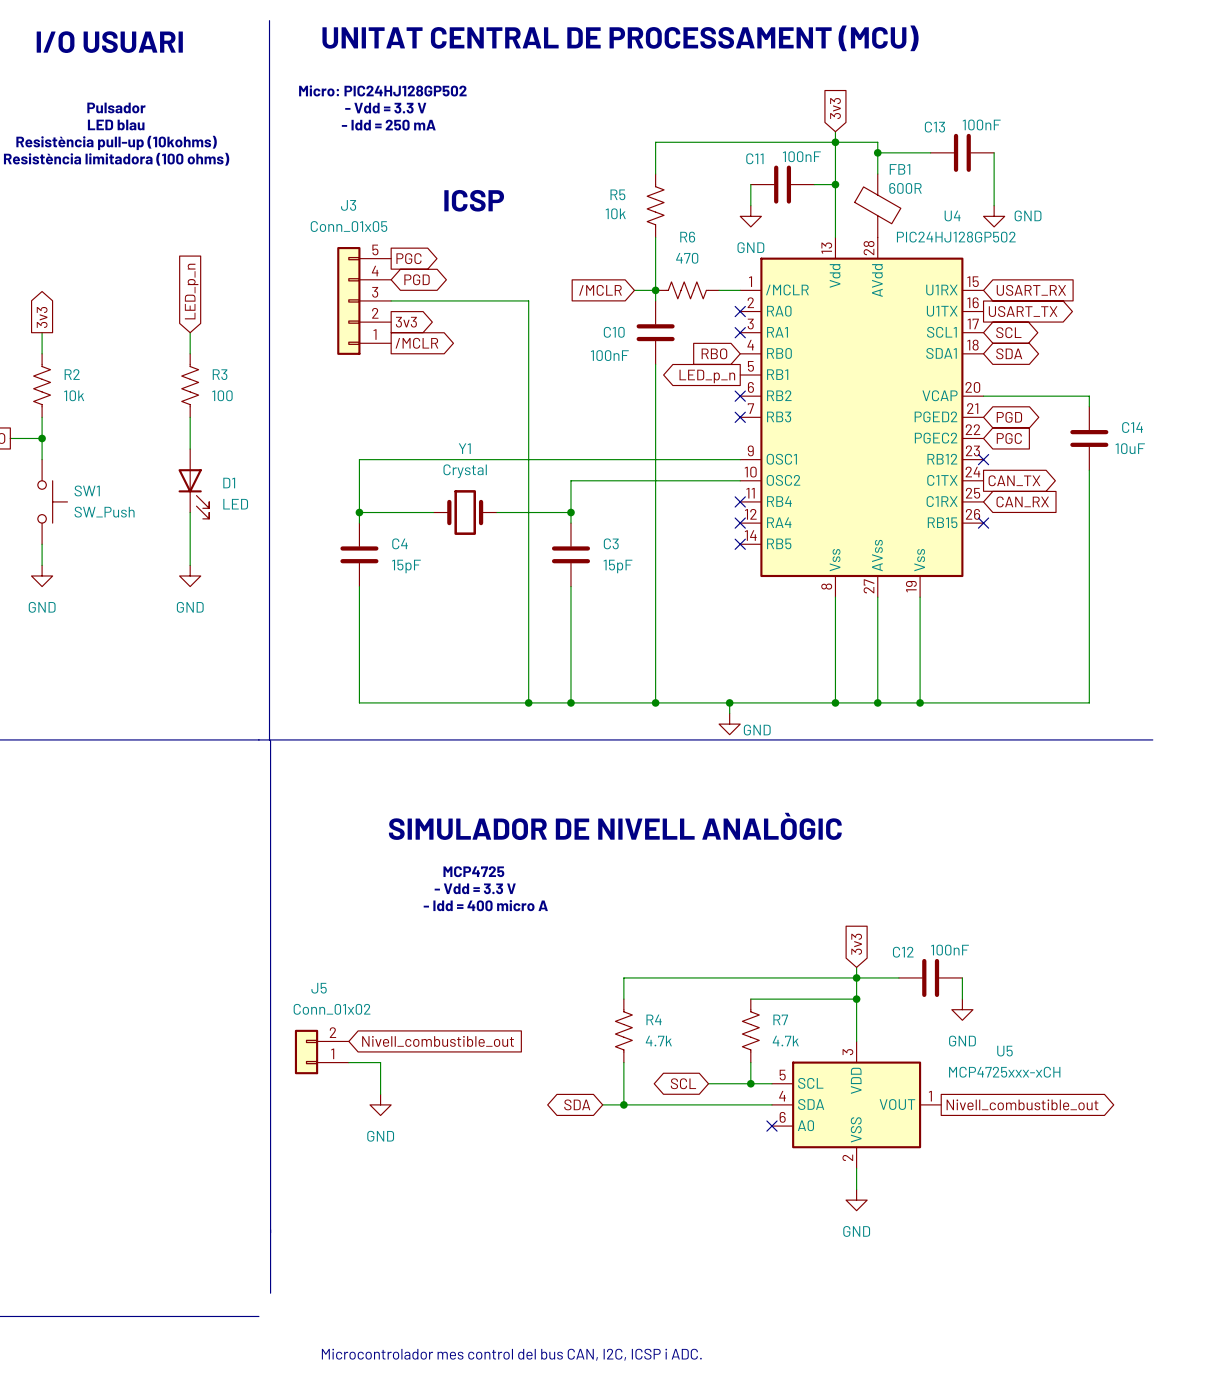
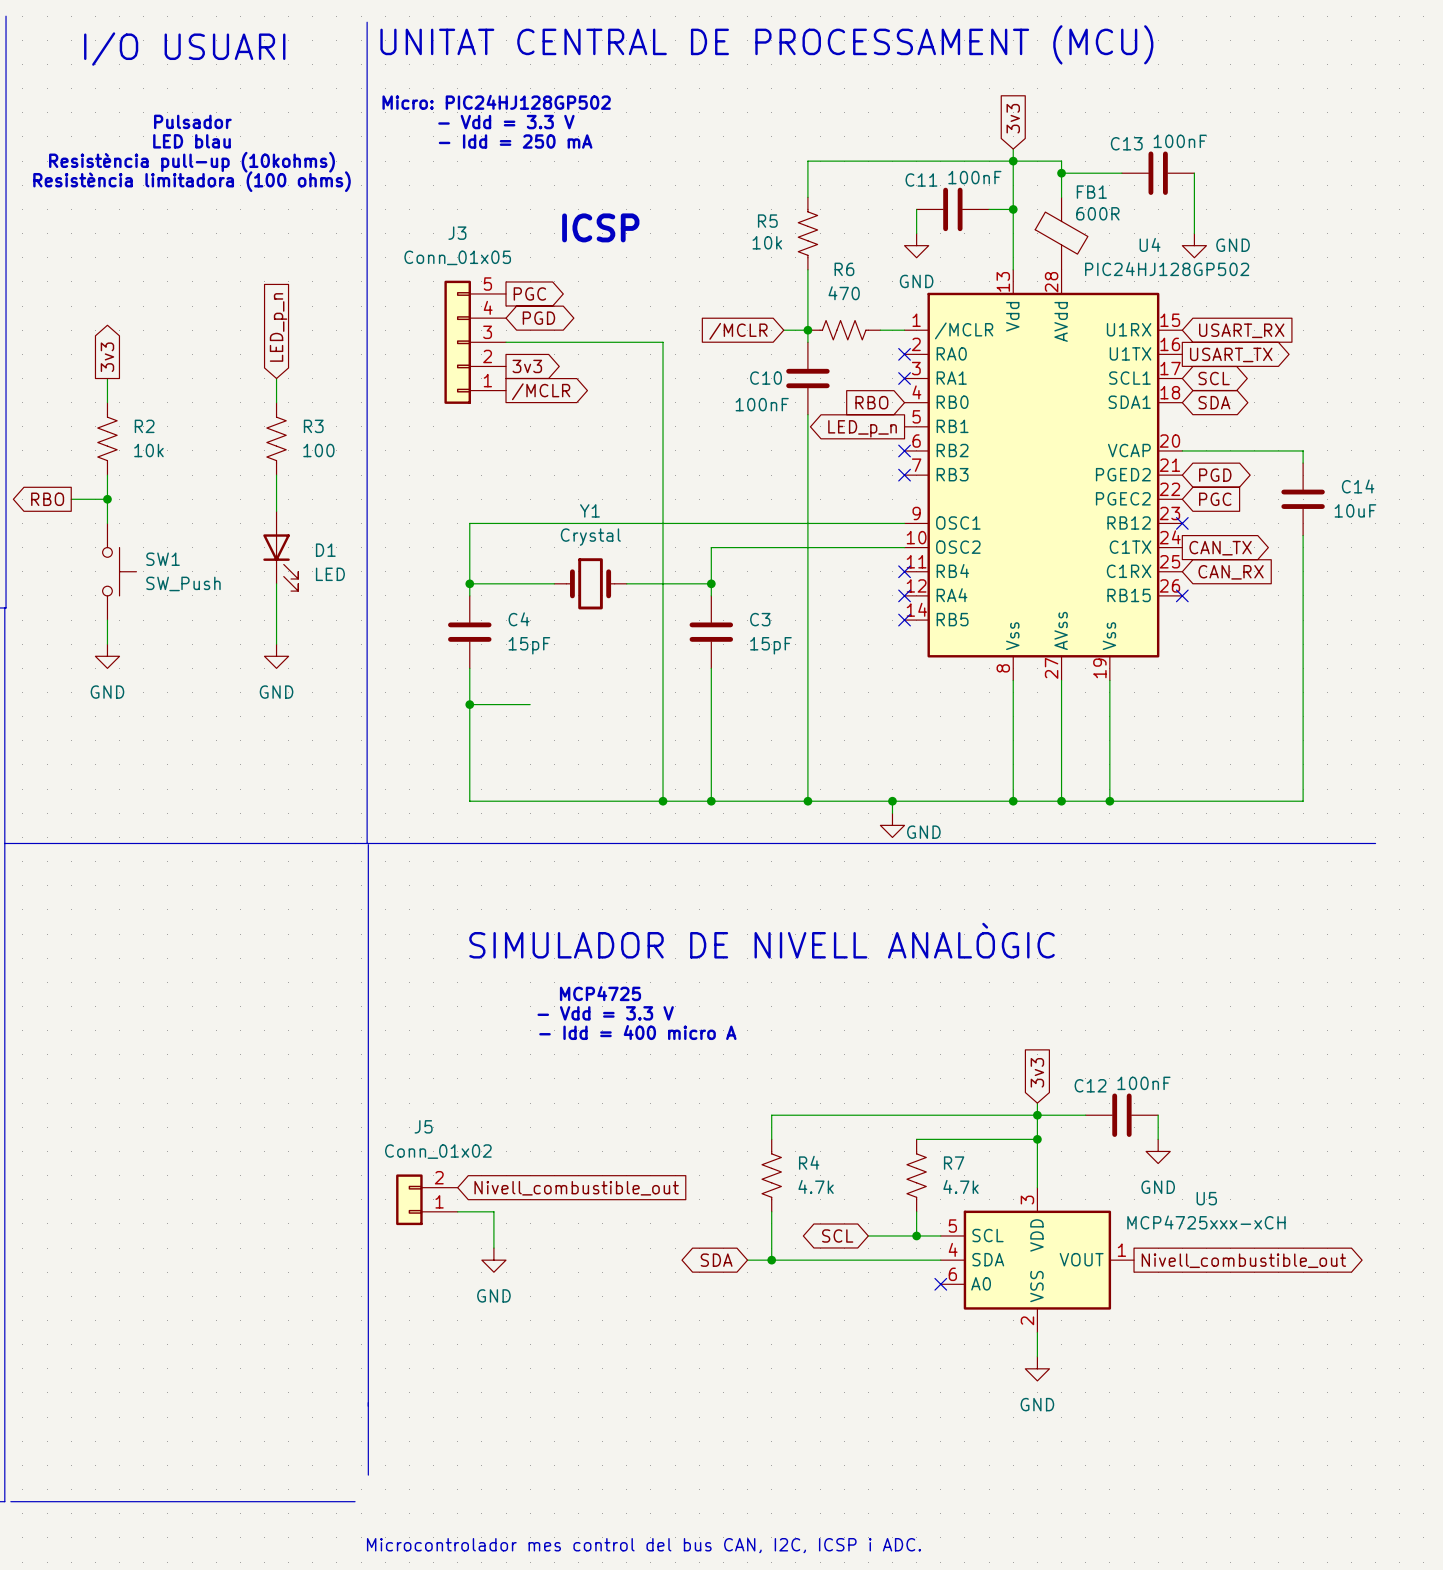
wire: none -> (469, 704) (530, 704)
junction: none -> (469, 704)

